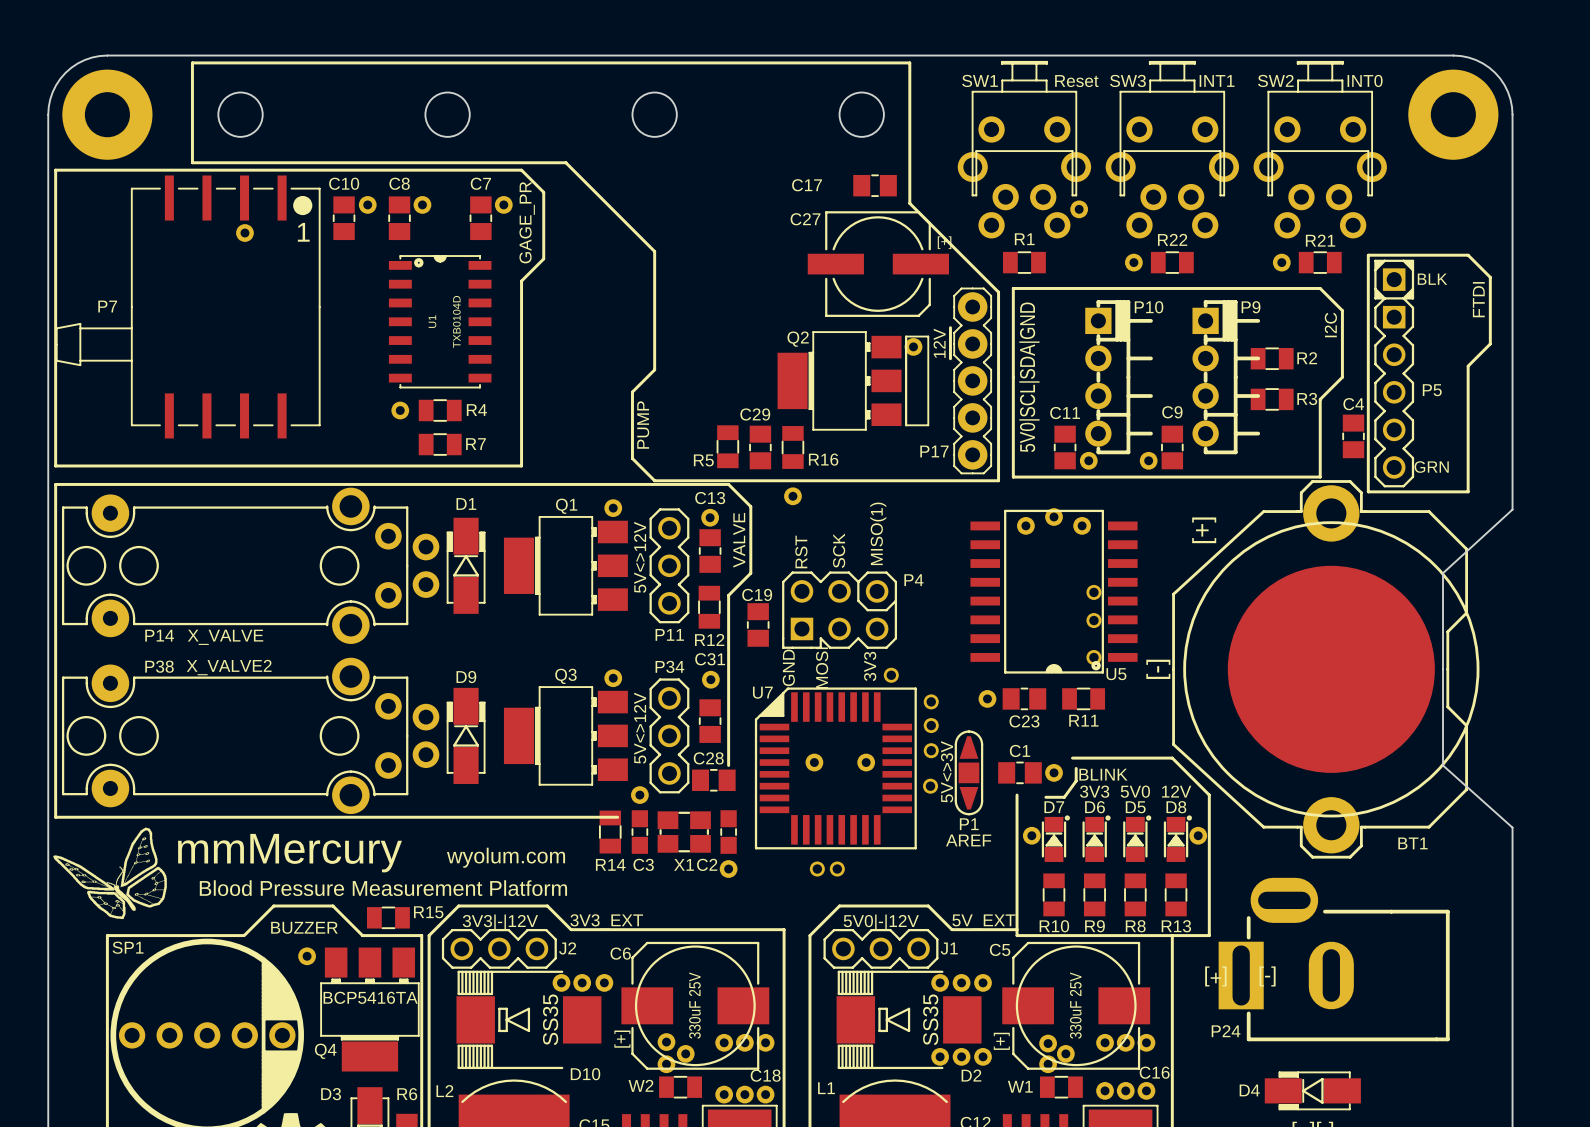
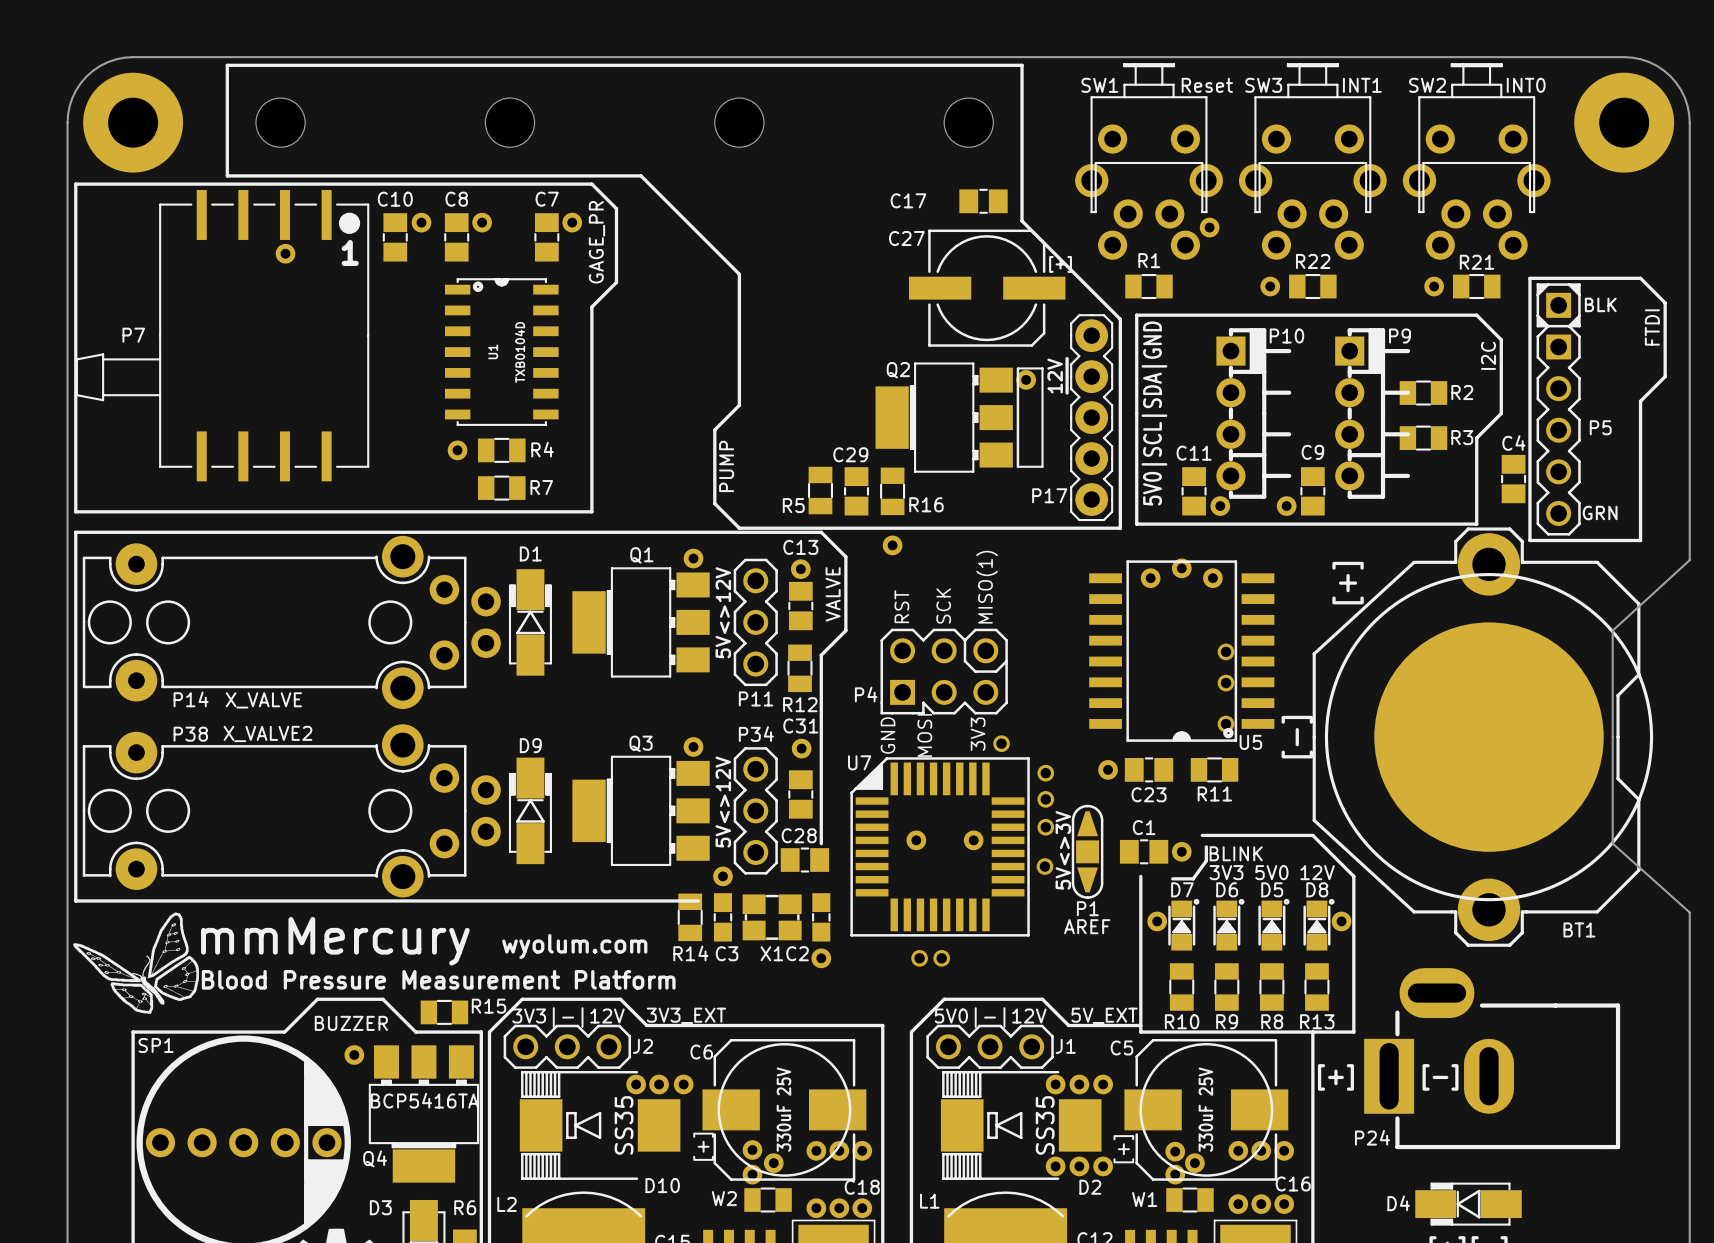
P4 name position: P4 (913, 580) -> P4 (866, 694)
C19: (758, 624) -> none

